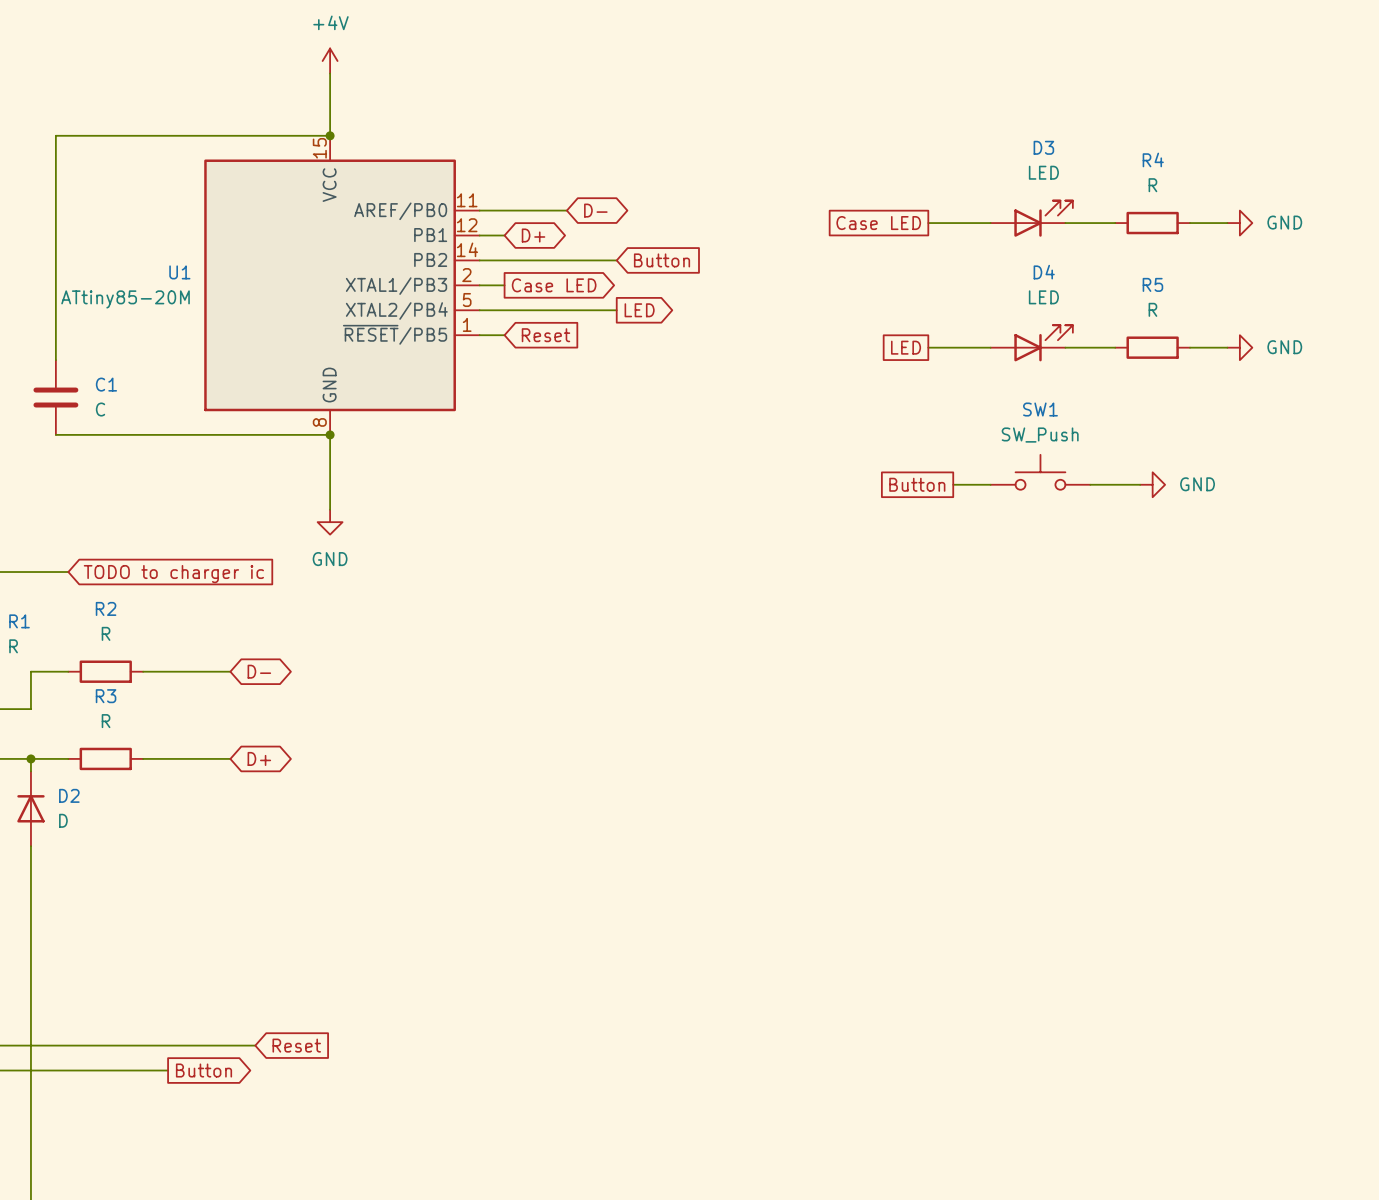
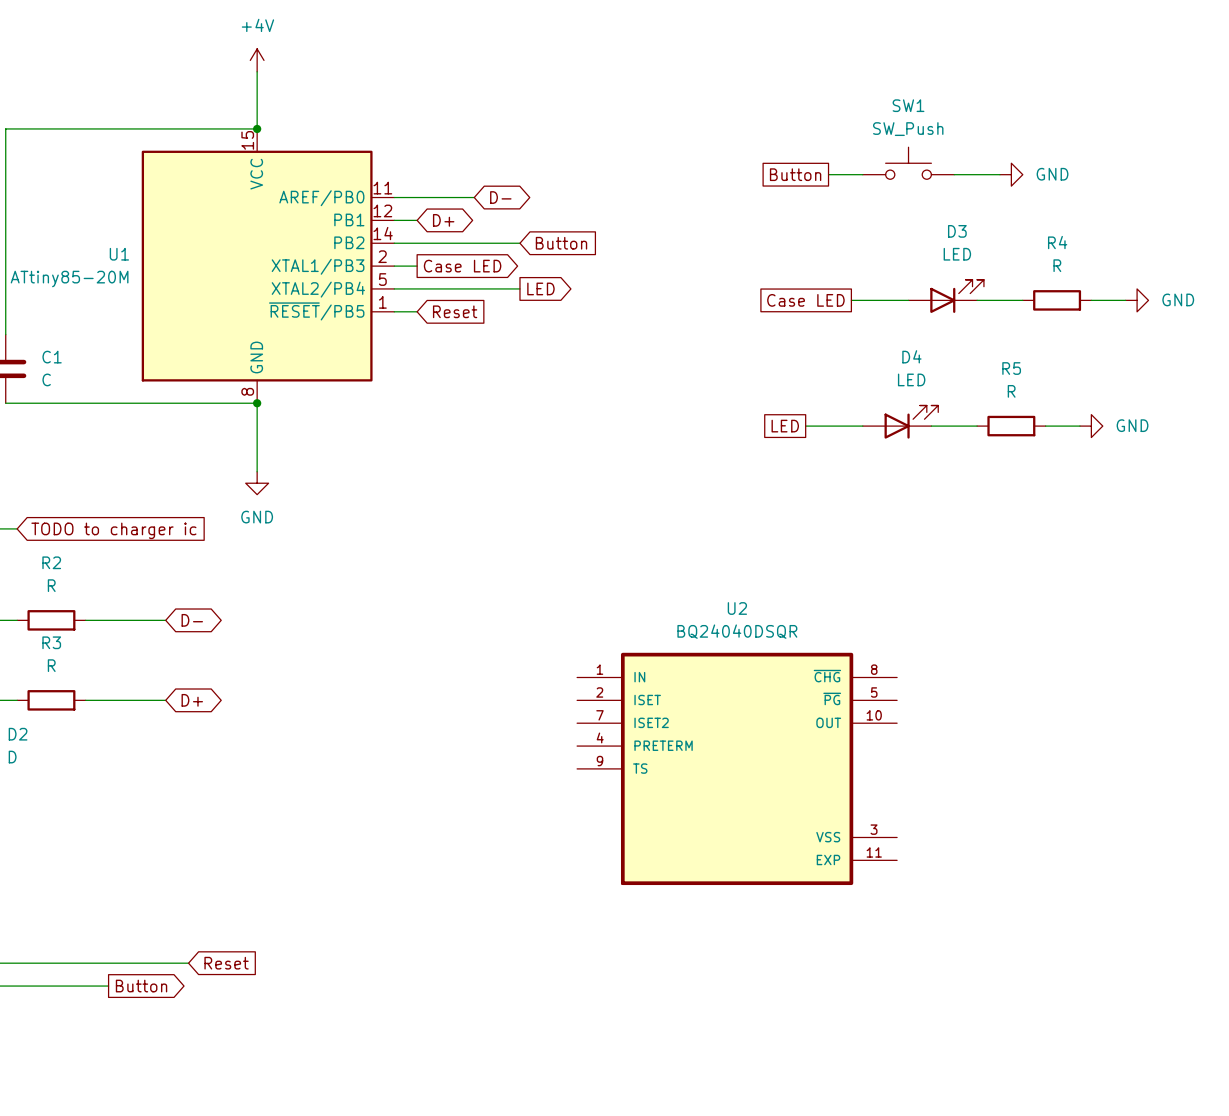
global label: none -> Button (795, 174)
wire: none -> (828, 174) (862, 174)
wire: none -> (954, 174) (999, 174)
power symbol: none -> GND (1011, 174)
D3 position: (1031, 218) -> (946, 296)
global label position: Case LED (878, 223) -> Case LED (805, 300)
wire: (928, 223) (990, 223) -> (805, 426) (862, 426)
wire: (1065, 223) (1115, 223) -> (931, 426) (977, 426)
R4 position: (1152, 223) -> (1057, 300)
wire: (1190, 223) (1227, 223) -> (1045, 426) (1079, 426)
power symbol: GND (1239, 223) -> none
power symbol: none -> GND (1137, 300)
D4 position: (1031, 343) -> (900, 422)
global label position: LED (906, 347) -> LED (785, 426)
wire: (928, 347) (990, 347) -> (851, 300) (908, 300)
wire: (1065, 347) (1115, 347) -> (977, 300) (1022, 300)
R5 position: (1152, 347) -> (1011, 426)
wire: (1190, 347) (1227, 347) -> (1091, 300) (1125, 300)
power symbol: GND (1239, 347) -> none
power symbol: none -> GND (1091, 426)
SW1 position: (1040, 472) -> (908, 163)
global label: Button (917, 484) -> none
wire: (953, 484) (990, 484) -> none
wire: (1090, 484) (1140, 484) -> none
power symbol: GND (1152, 484) -> none
U2: none -> BQ24040DSQR (737, 768)

